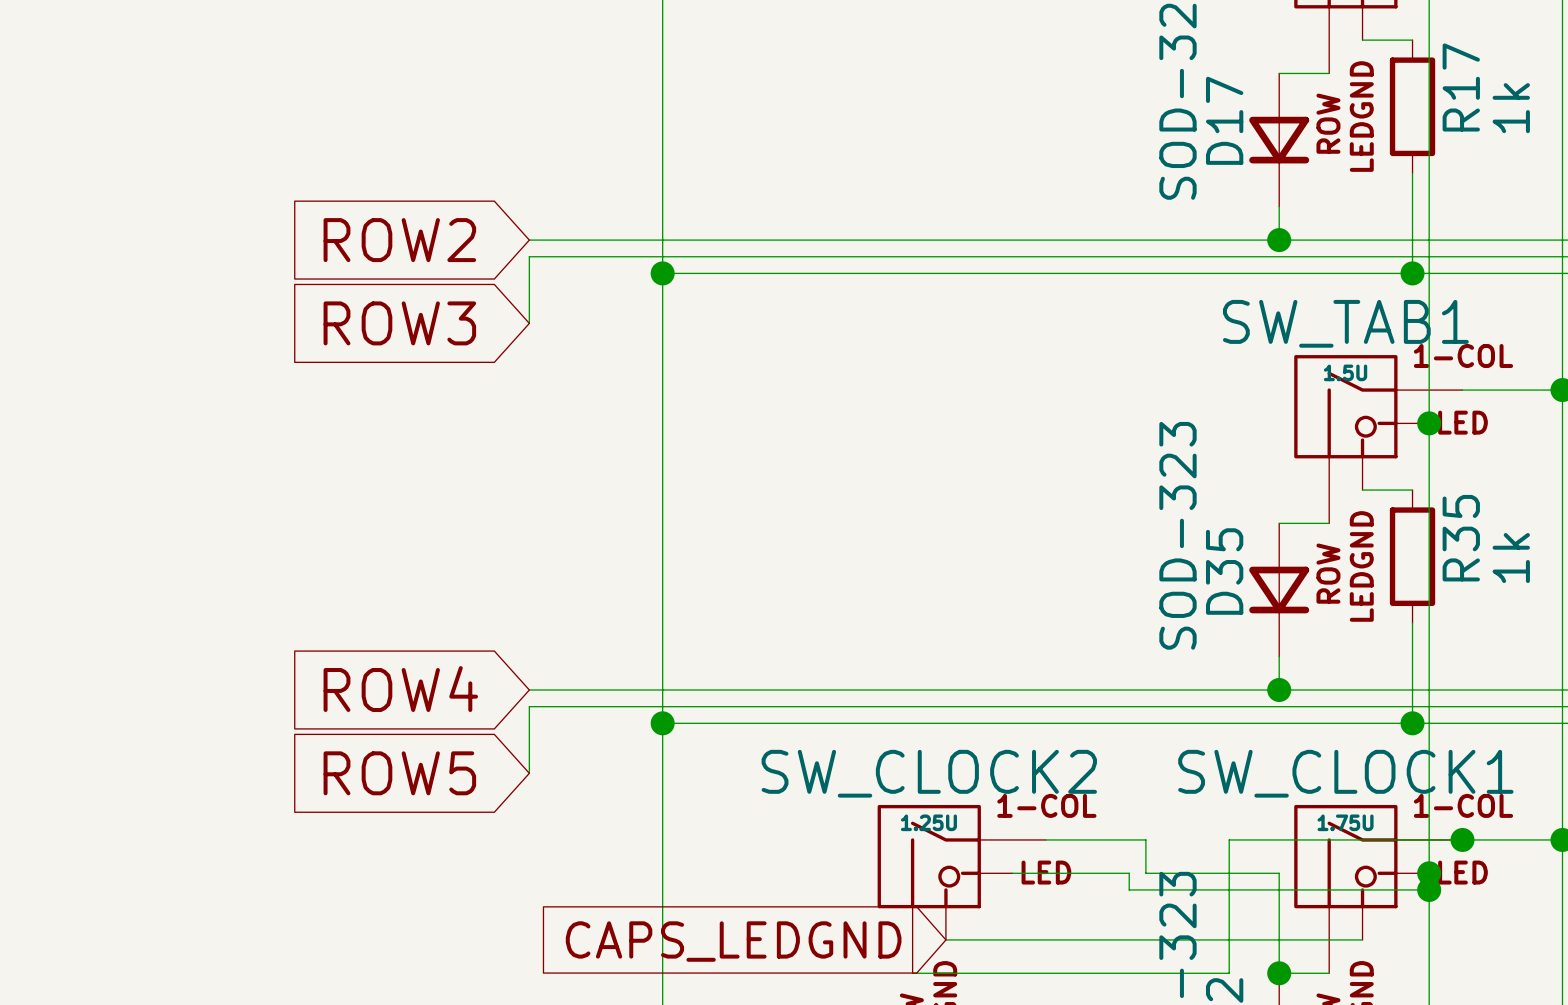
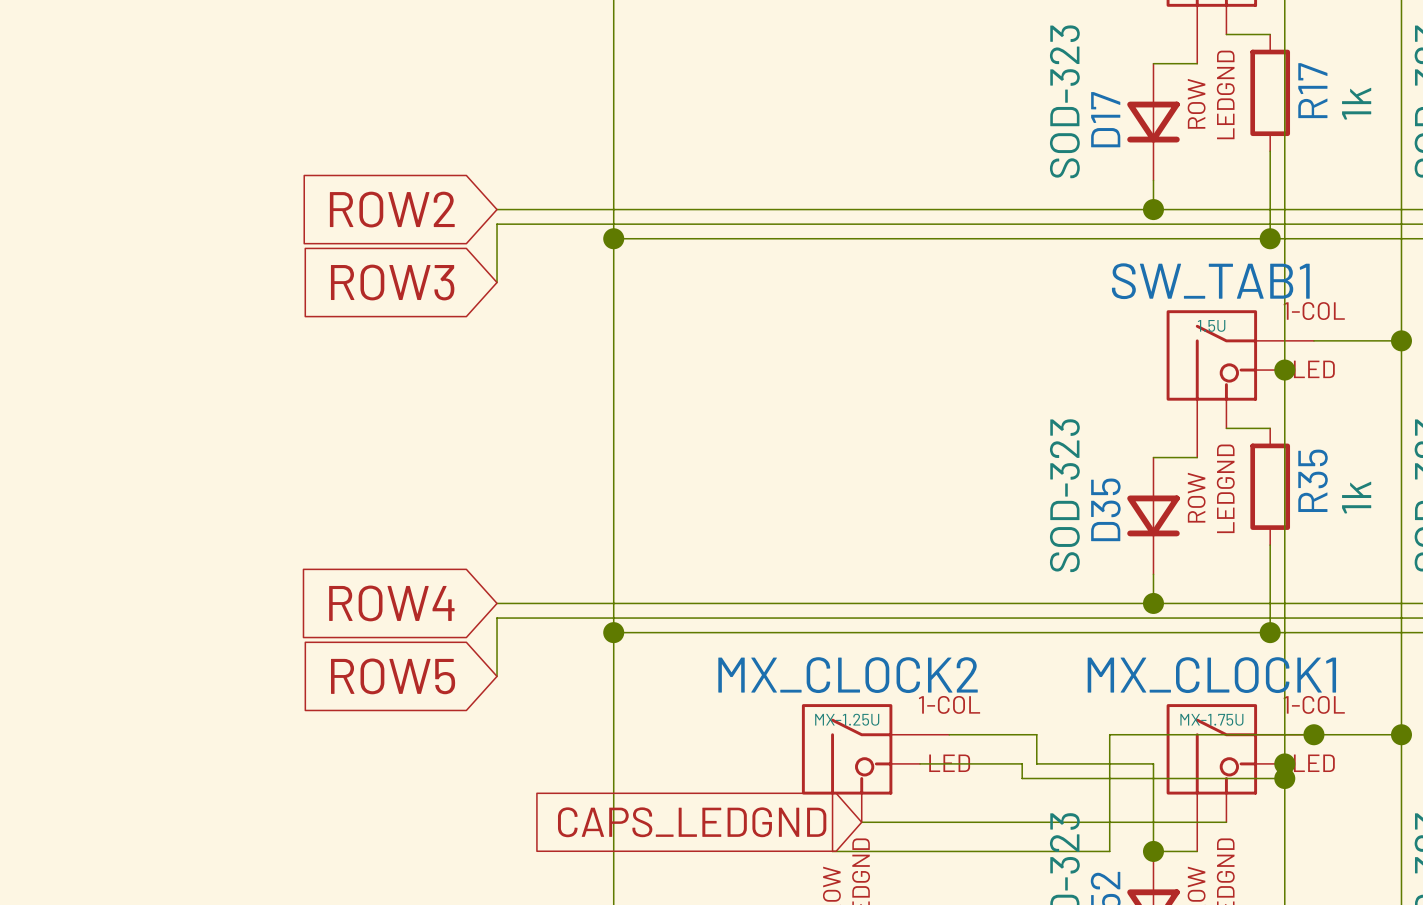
SW_CLOCK2 name: SW_CLOCK2 (929, 773) -> MX_CLOCK2 (848, 675)
SW_CLOCK1 name: SW_CLOCK1 (1345, 773) -> MX_CLOCK1 (1211, 675)
SW_CLOCK2 value: 1.25U (928, 822) -> MX-1.25U (847, 719)
SW_CLOCK1 value: 1.75U (1345, 822) -> MX-1.75U (1211, 719)

